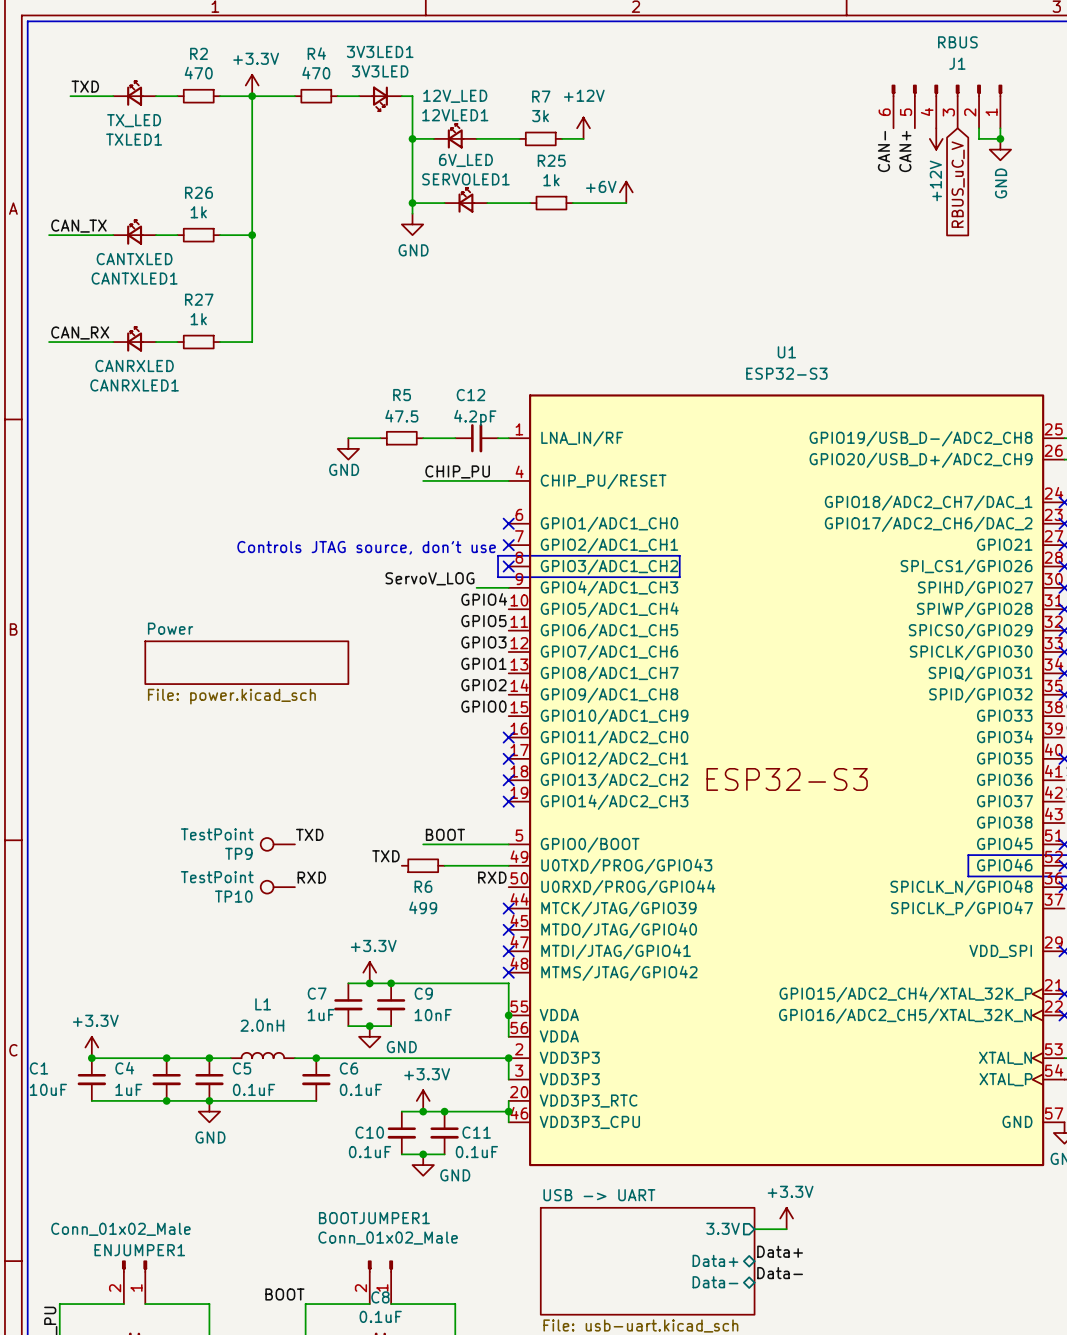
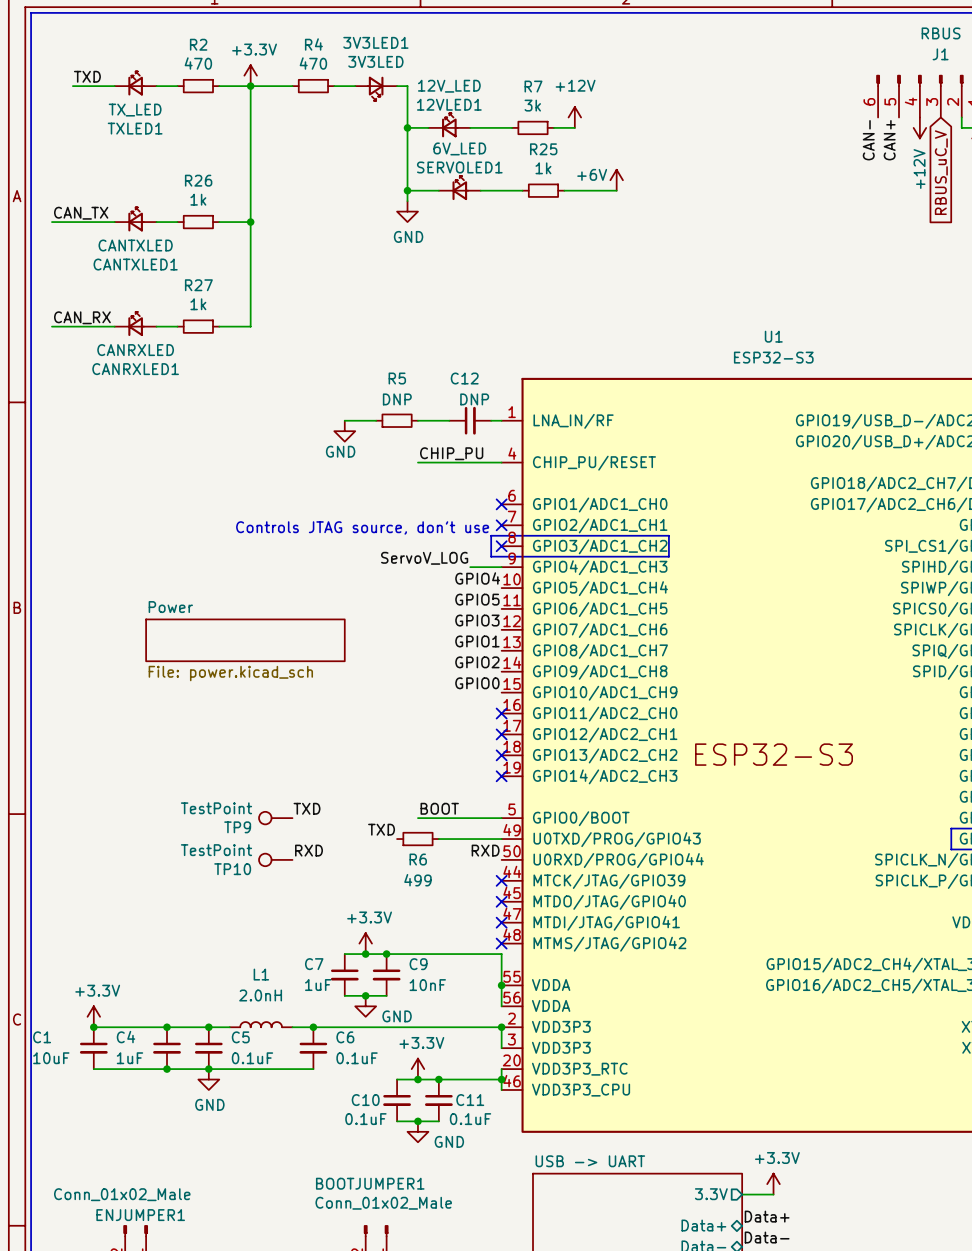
R5 value: 47.5 (401, 416) -> DNP (397, 399)
C12 value: 4.2pF (475, 417) -> DNP (474, 399)

